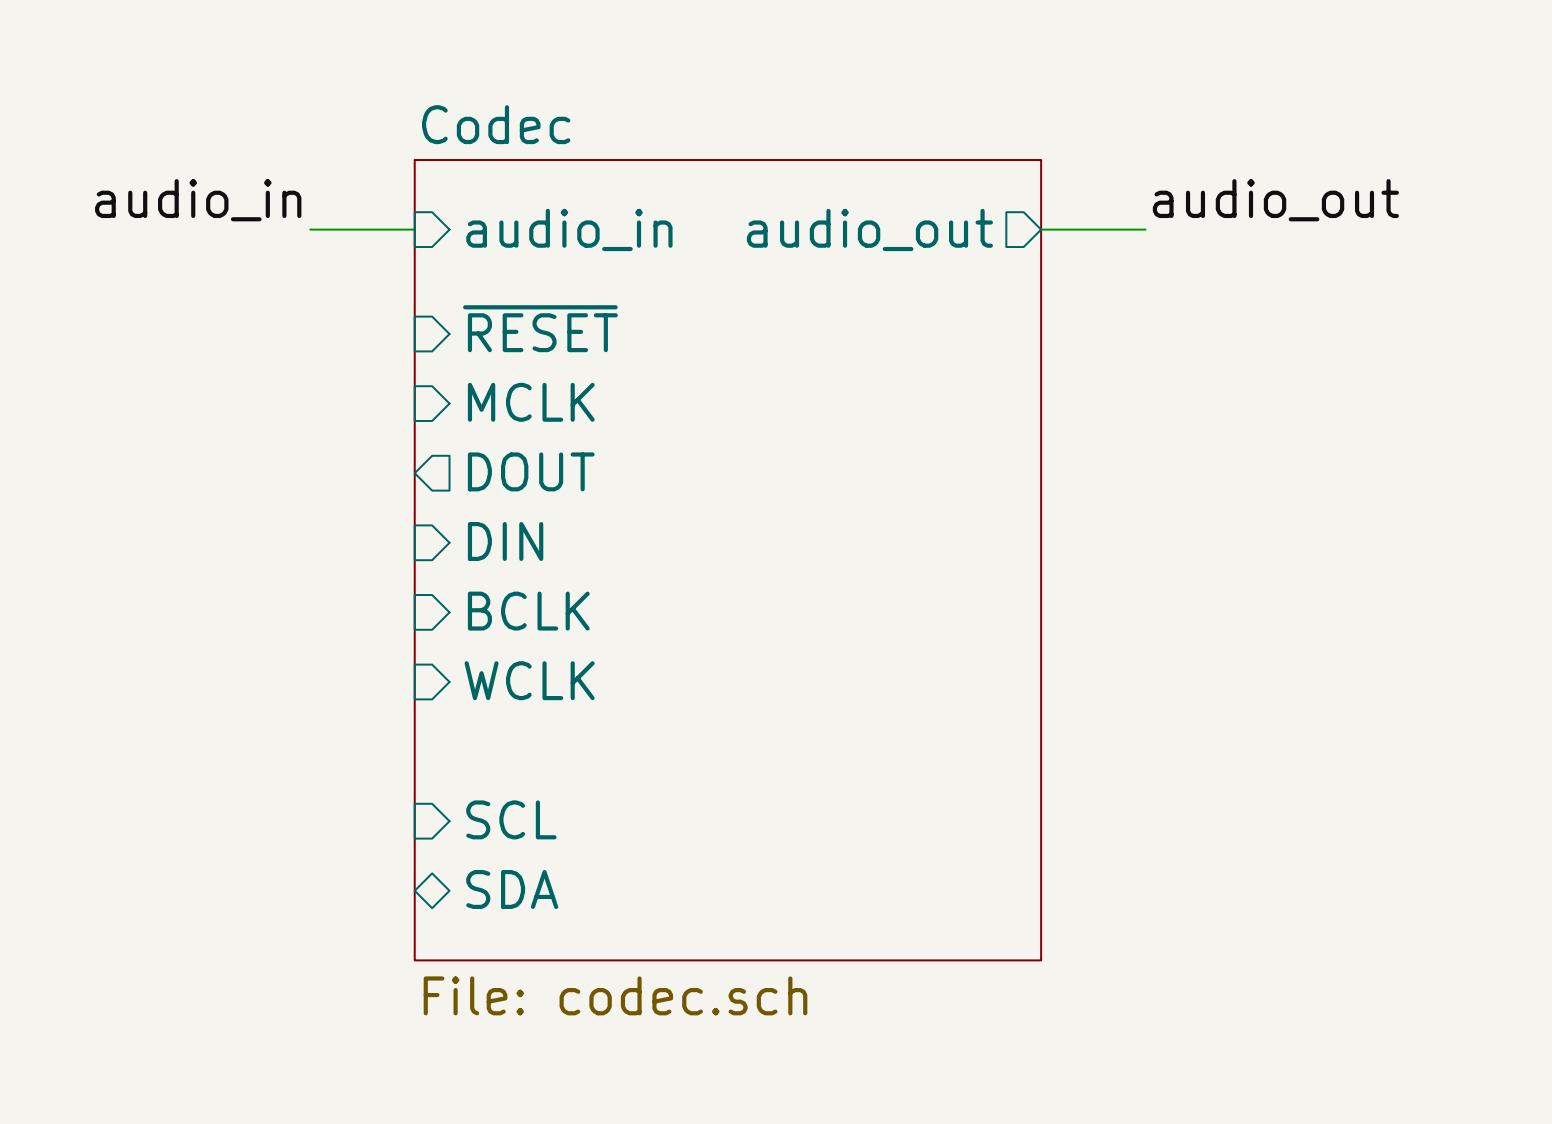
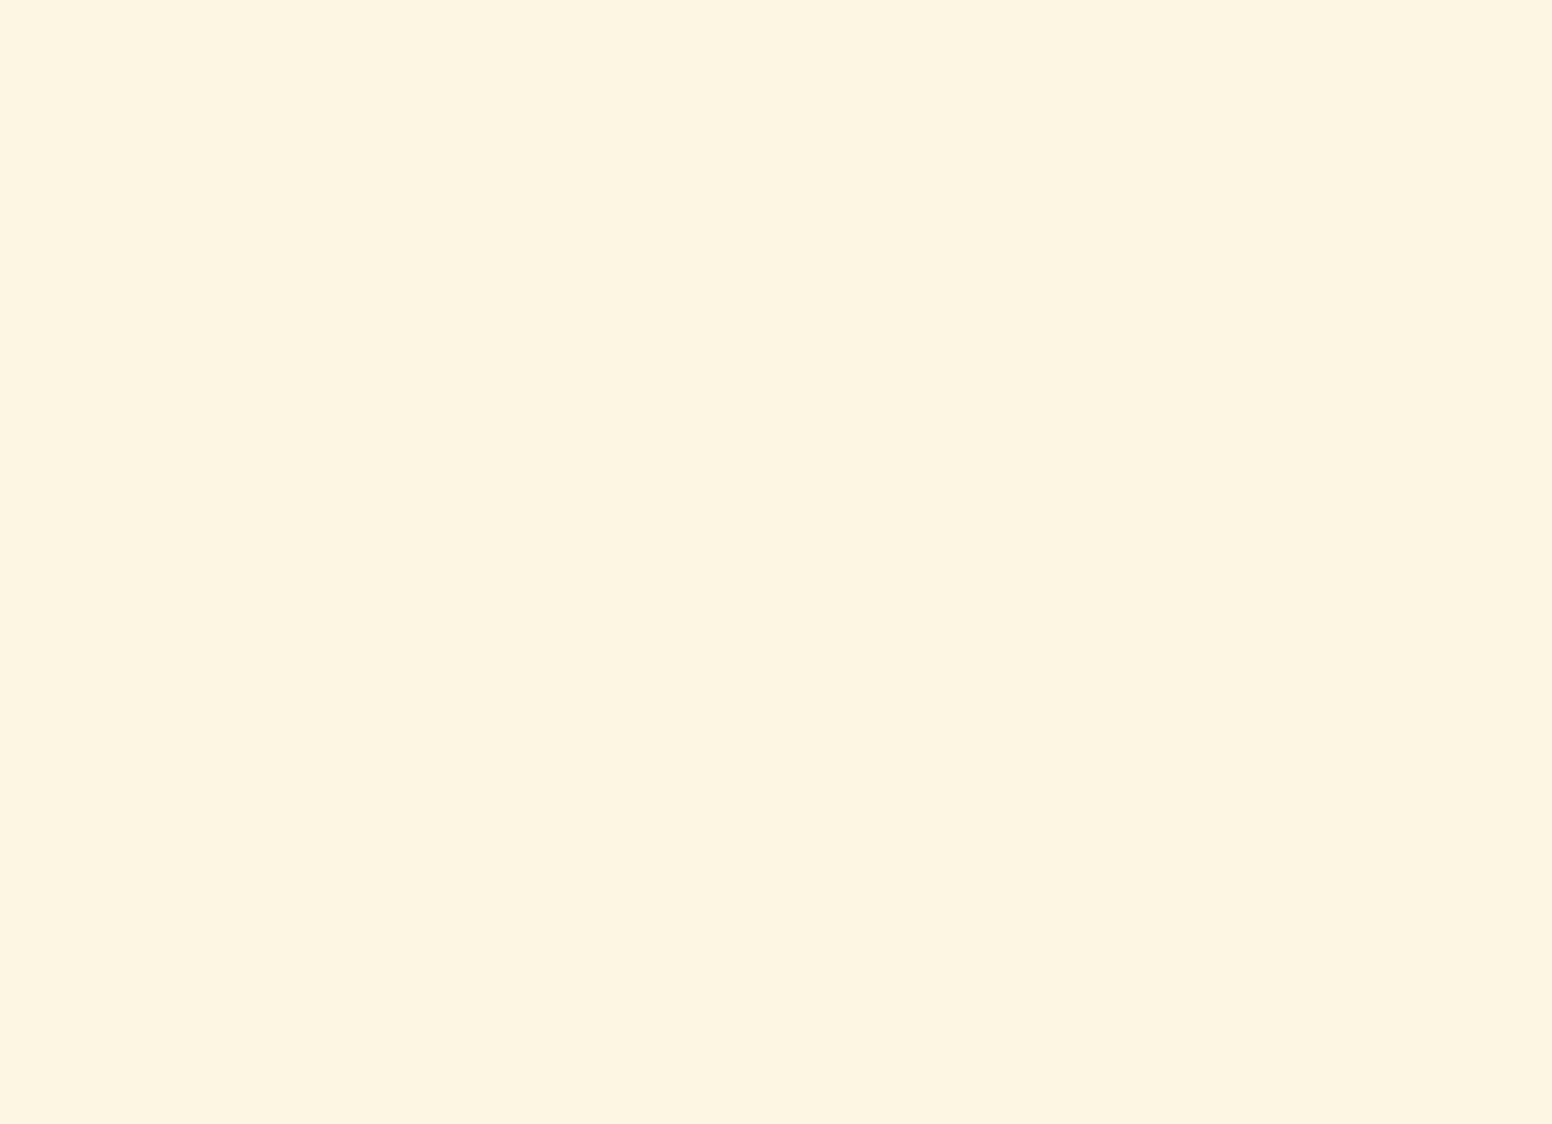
label: audio_in (198, 200) -> none
label: audio_out (1275, 200) -> none
wire: (310, 229) (414, 229) -> none
sheet pin: audio_in (569, 229) -> none
sheet pin: audio_out (869, 229) -> none
wire: (1041, 229) (1145, 229) -> none
sheet pin: ~{RESET} (540, 328) -> none
sheet pin: MCLK (531, 402) -> none
sheet pin: DOUT (531, 471) -> none
sheet pin: DIN (505, 541) -> none
sheet Codec: File: codec.sch (727, 560) -> none
sheet pin: BCLK (528, 611) -> none
sheet pin: WCLK (529, 680) -> none
sheet pin: SCL (511, 819) -> none
sheet pin: SDA (512, 889) -> none

